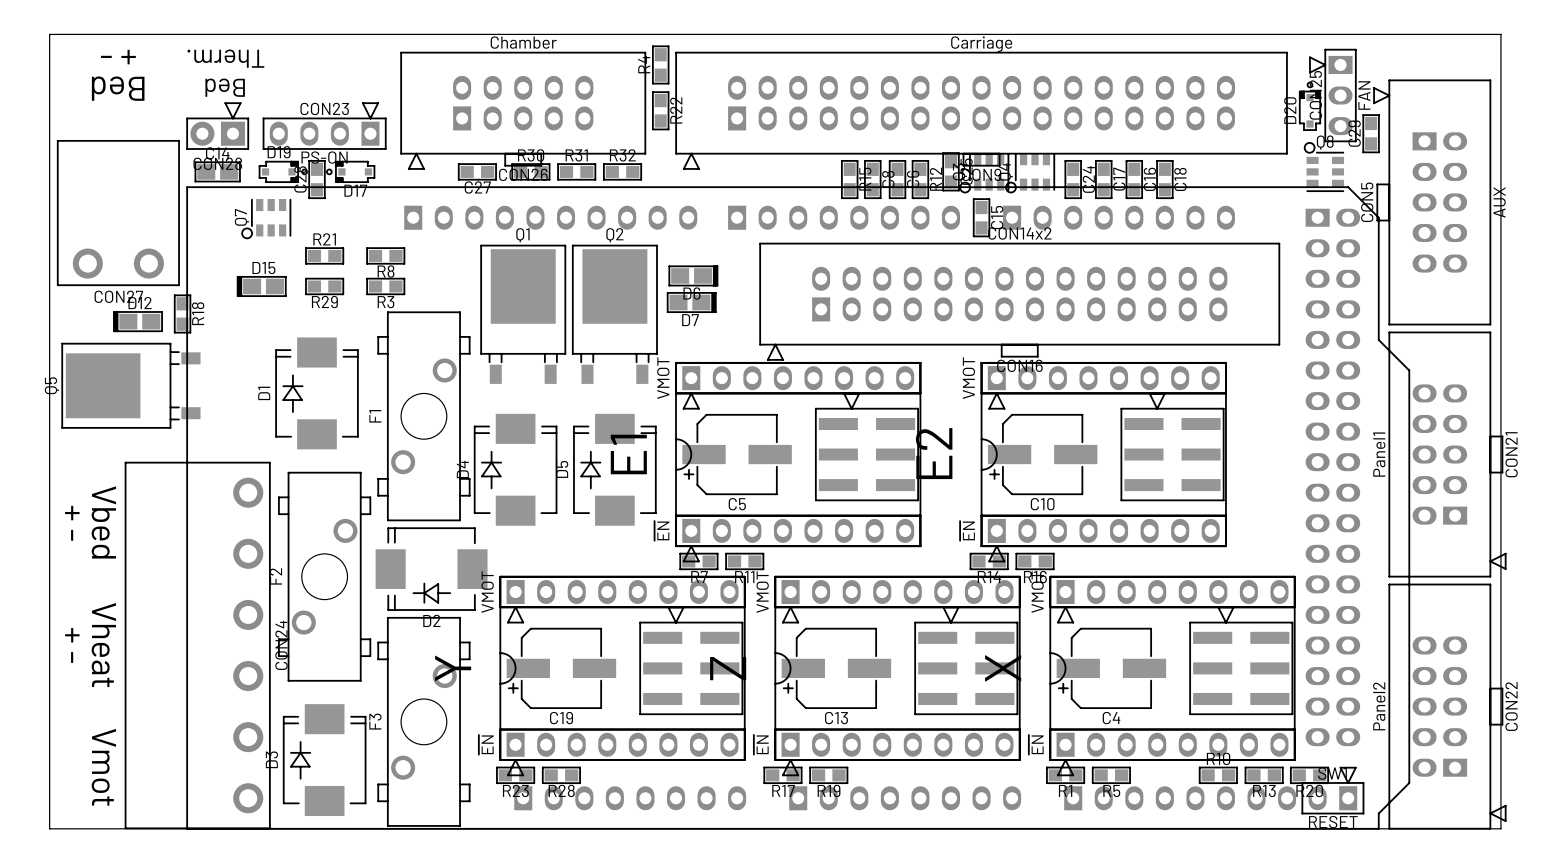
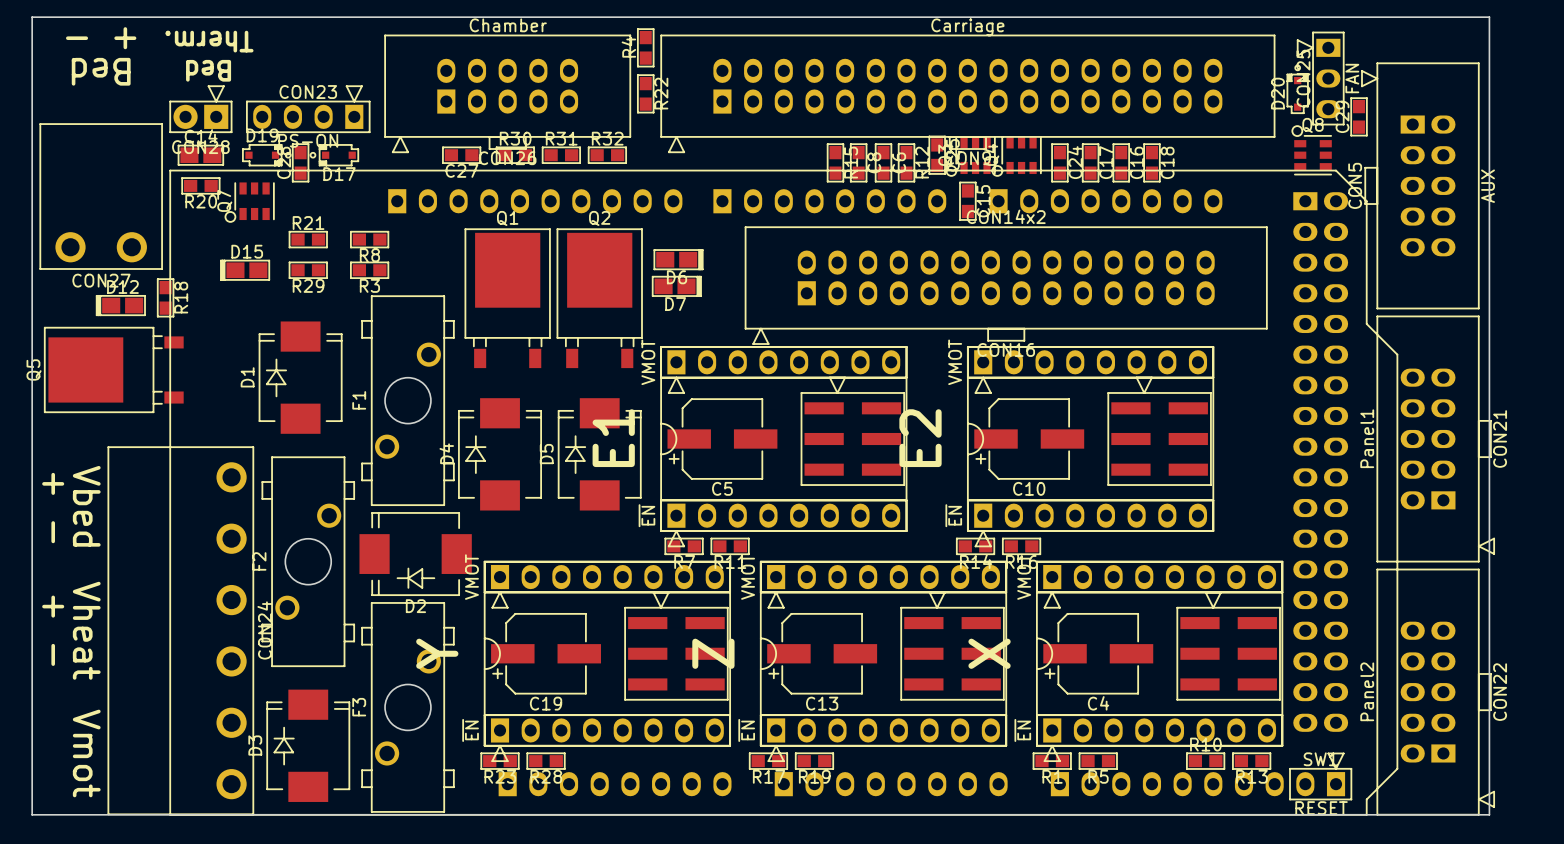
R20 position: (1309, 775) -> (200, 185)

